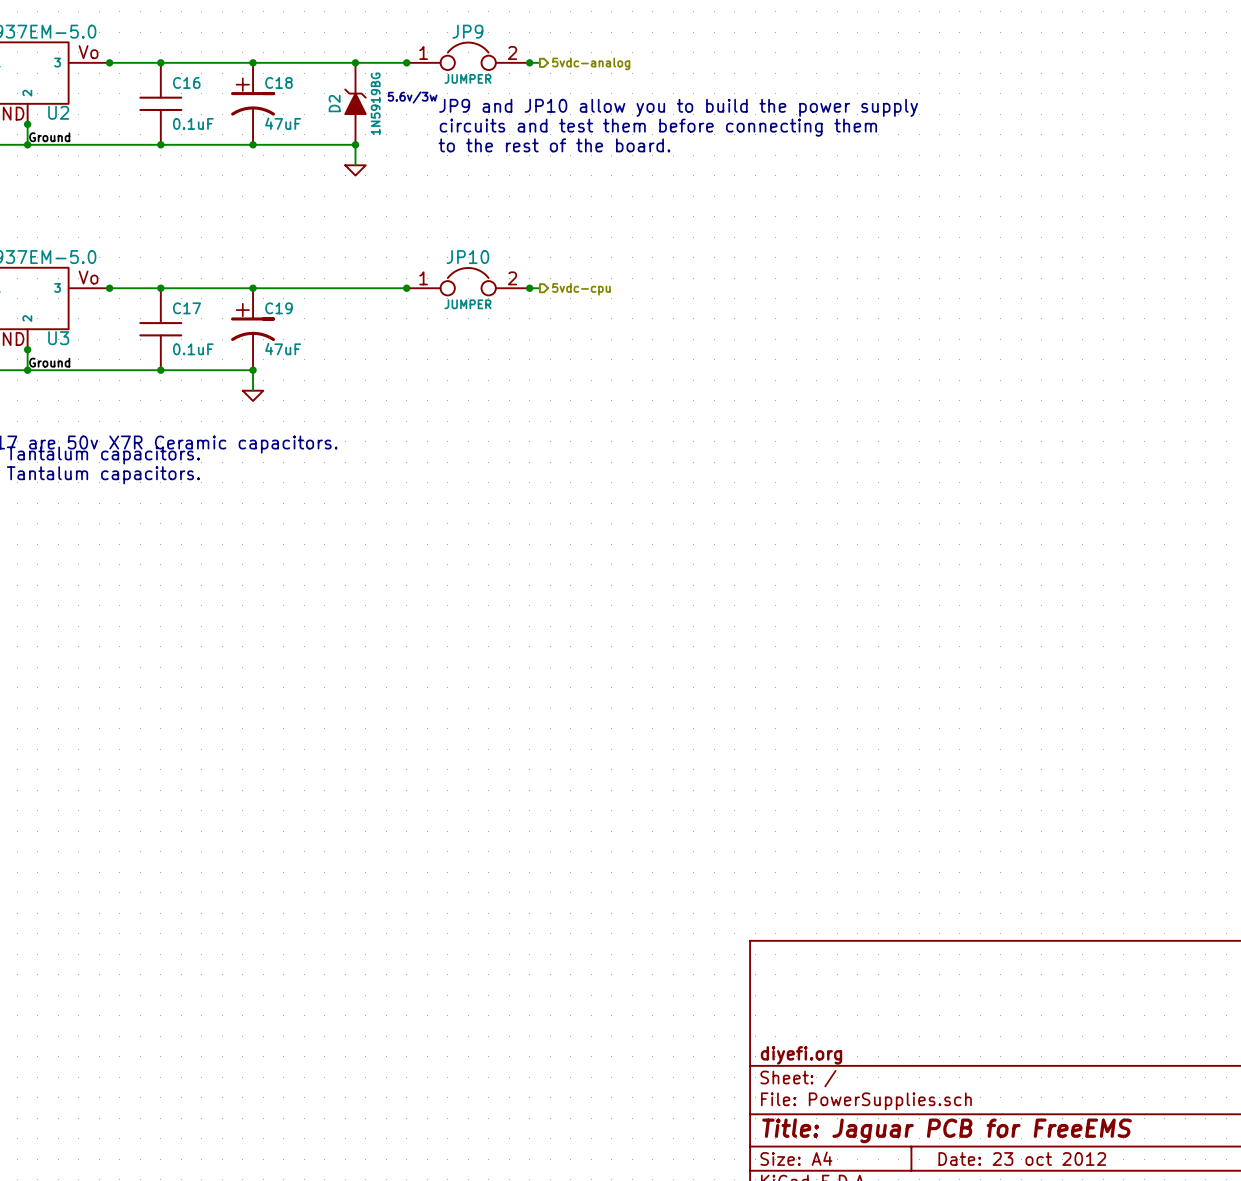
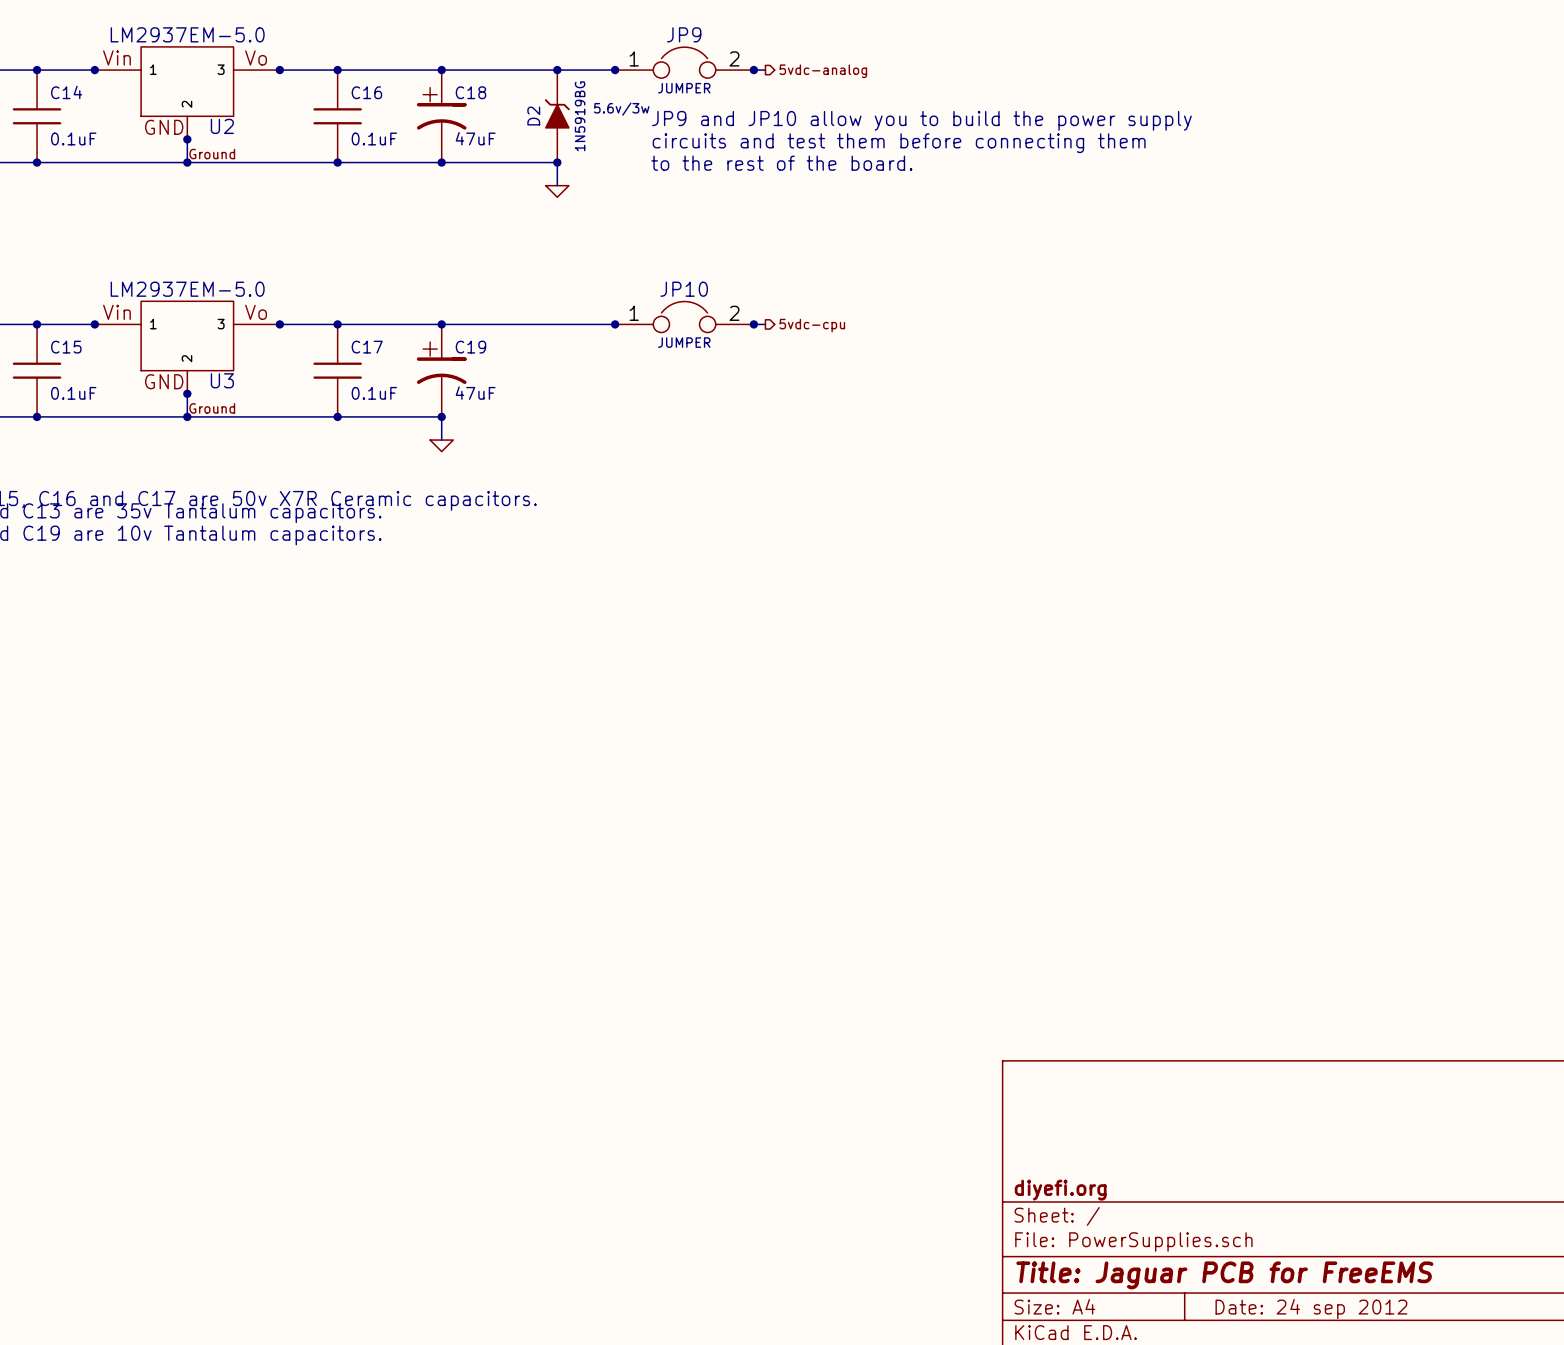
title block: Date: 23 oct 2012 (1022, 1159) -> Date: 24 sep 2012 (1311, 1309)

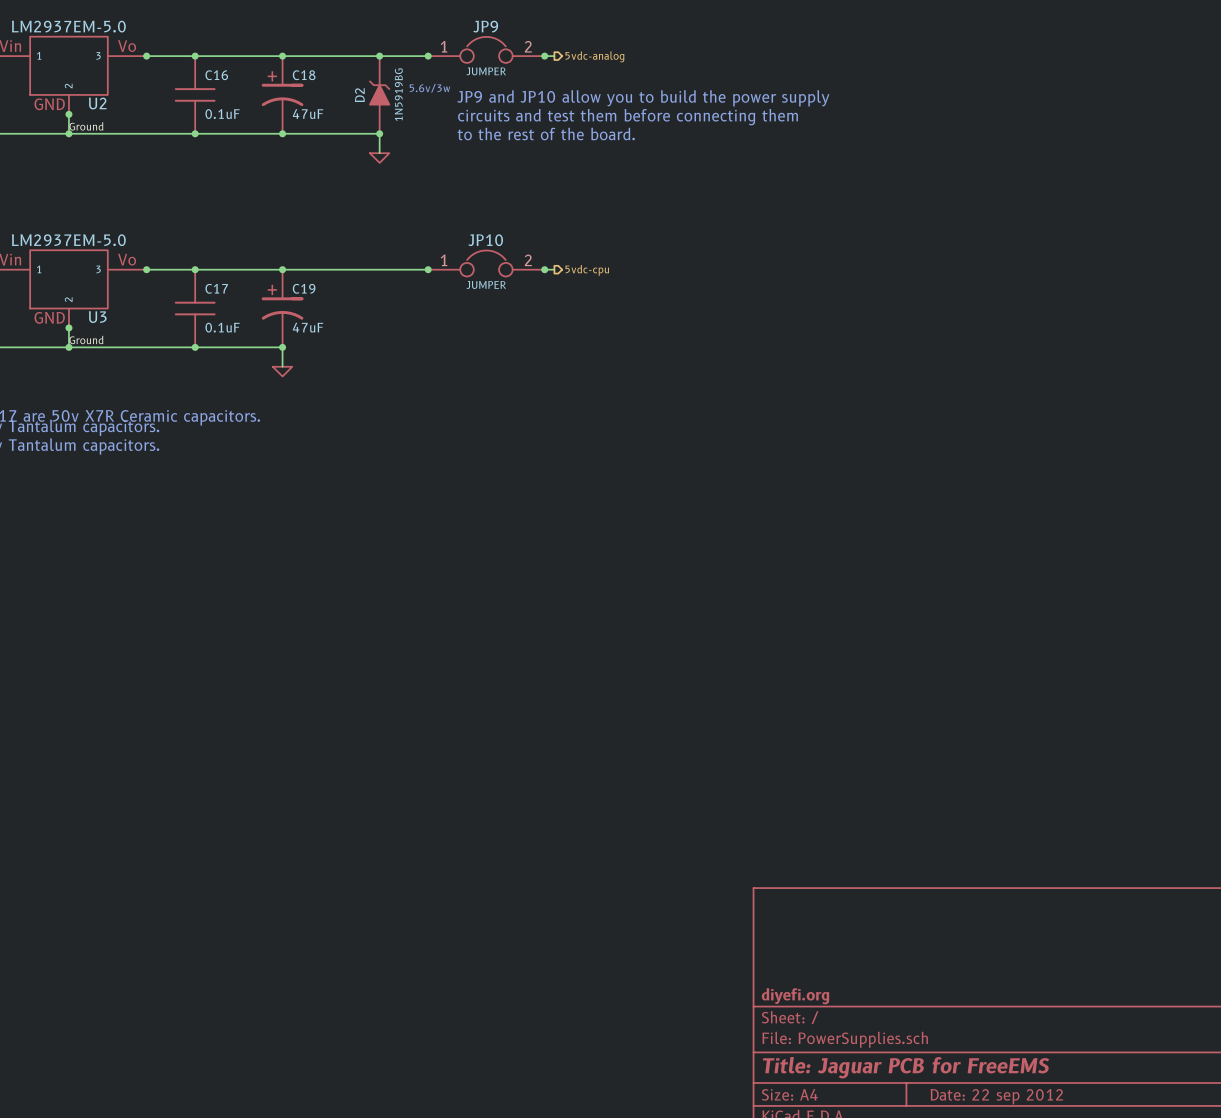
title block: Date: 24 sep 2012 (1311, 1309) -> Date: 22 sep 2012 (996, 1096)

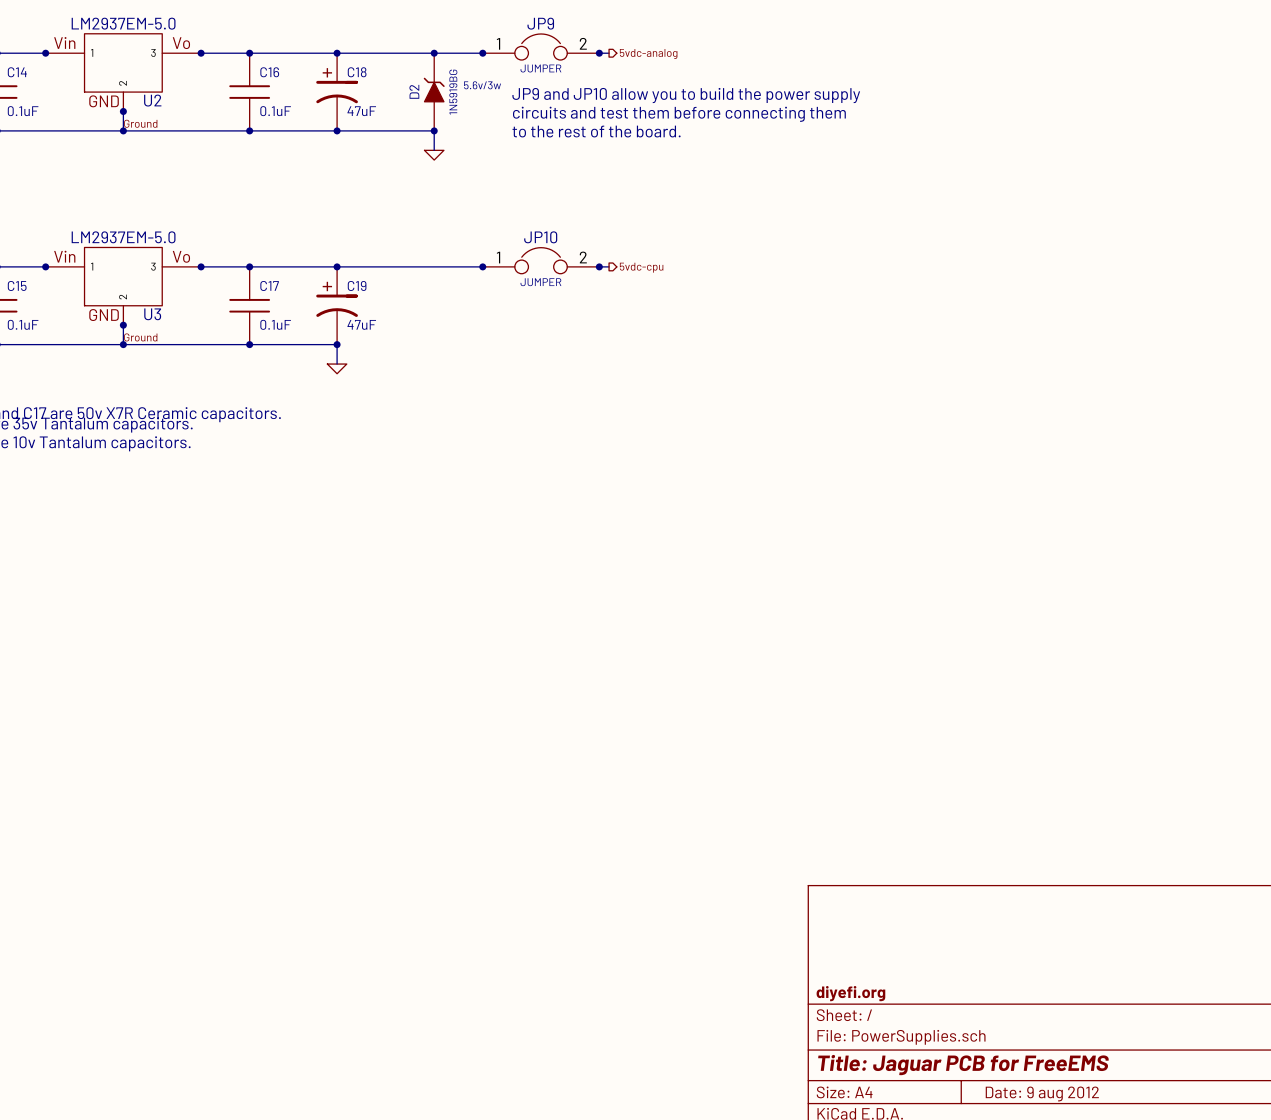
title block: Date: 22 sep 2012 (996, 1096) -> Date: 9 aug 2012 (1042, 1093)

